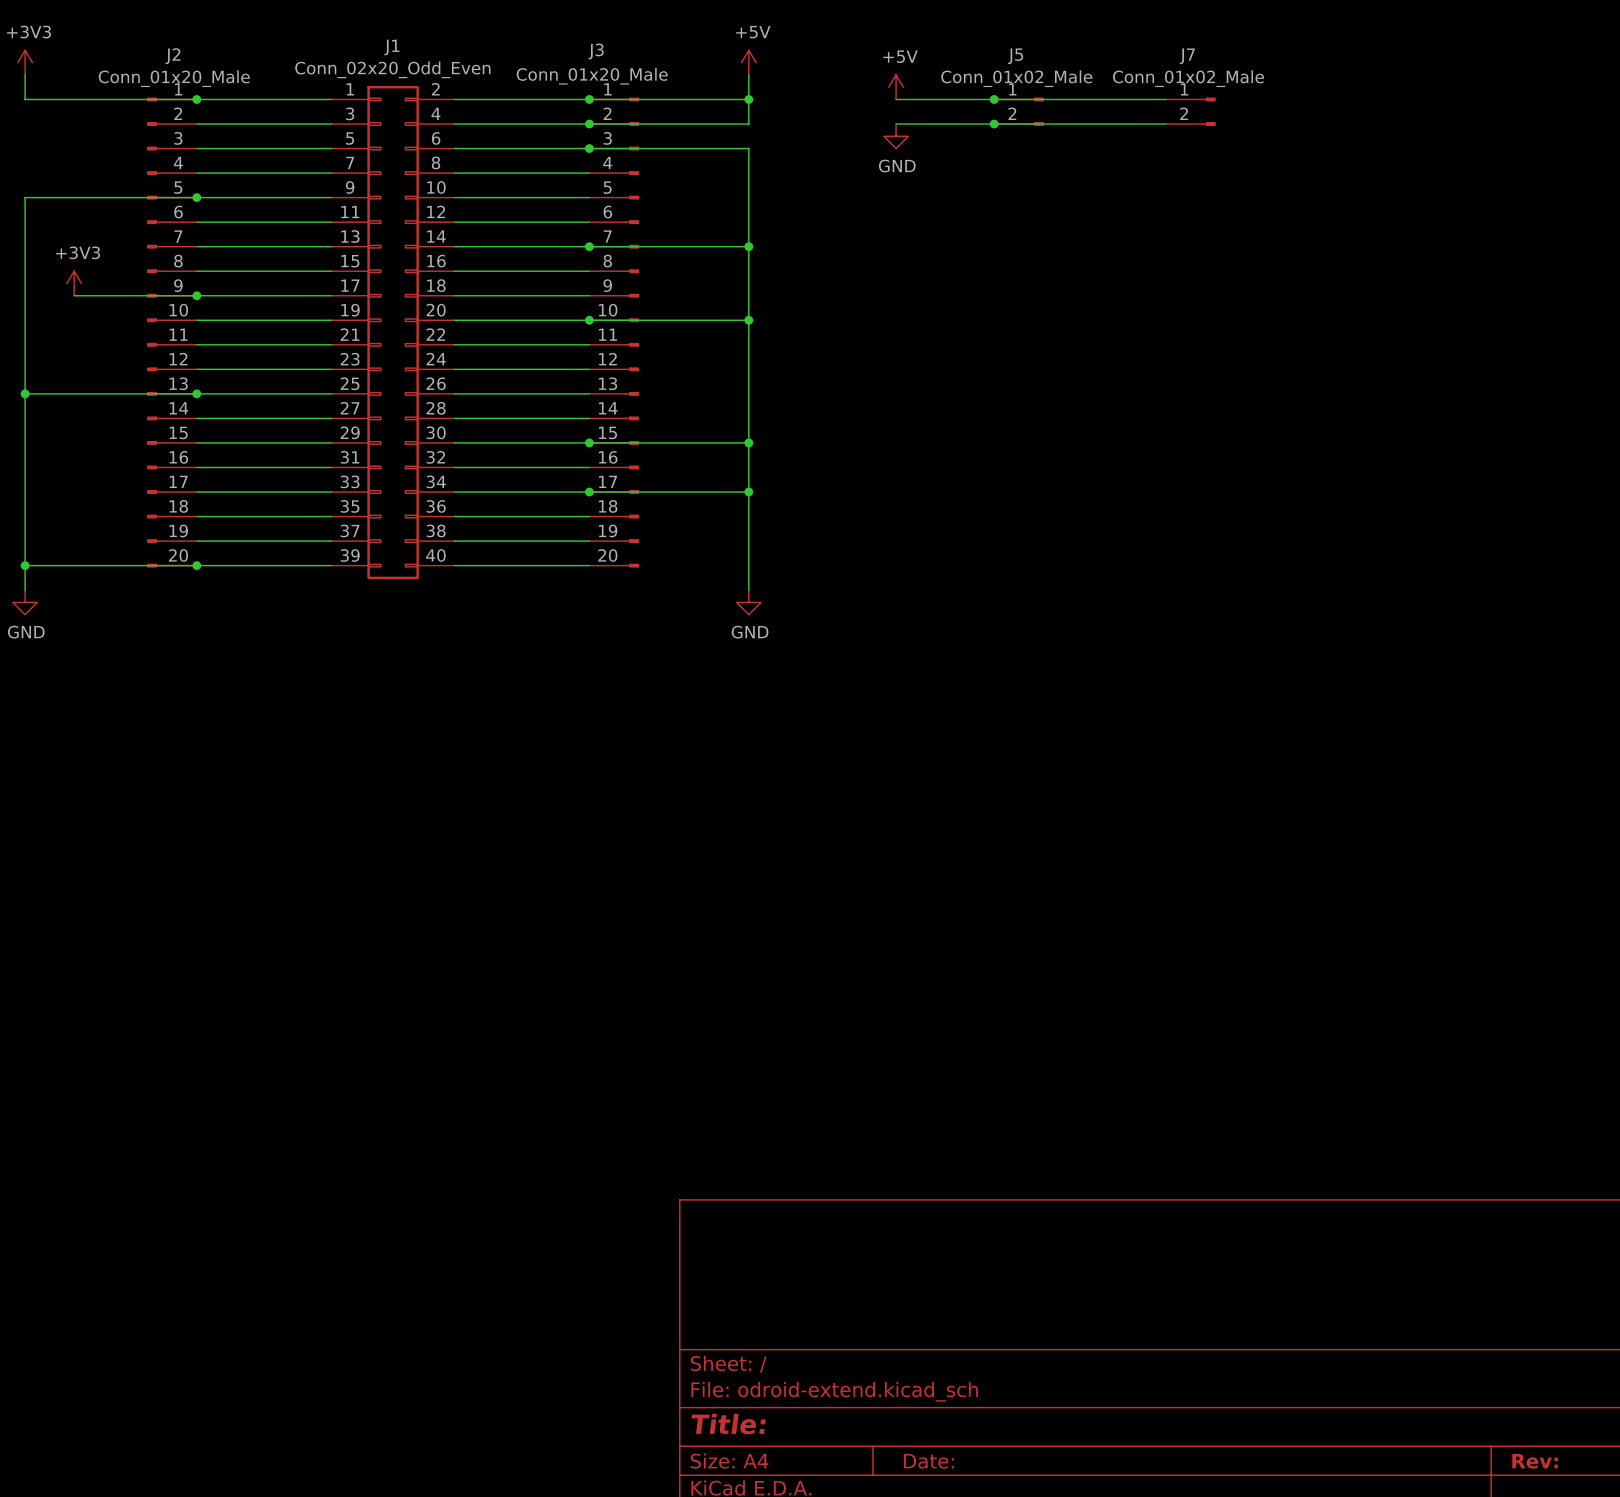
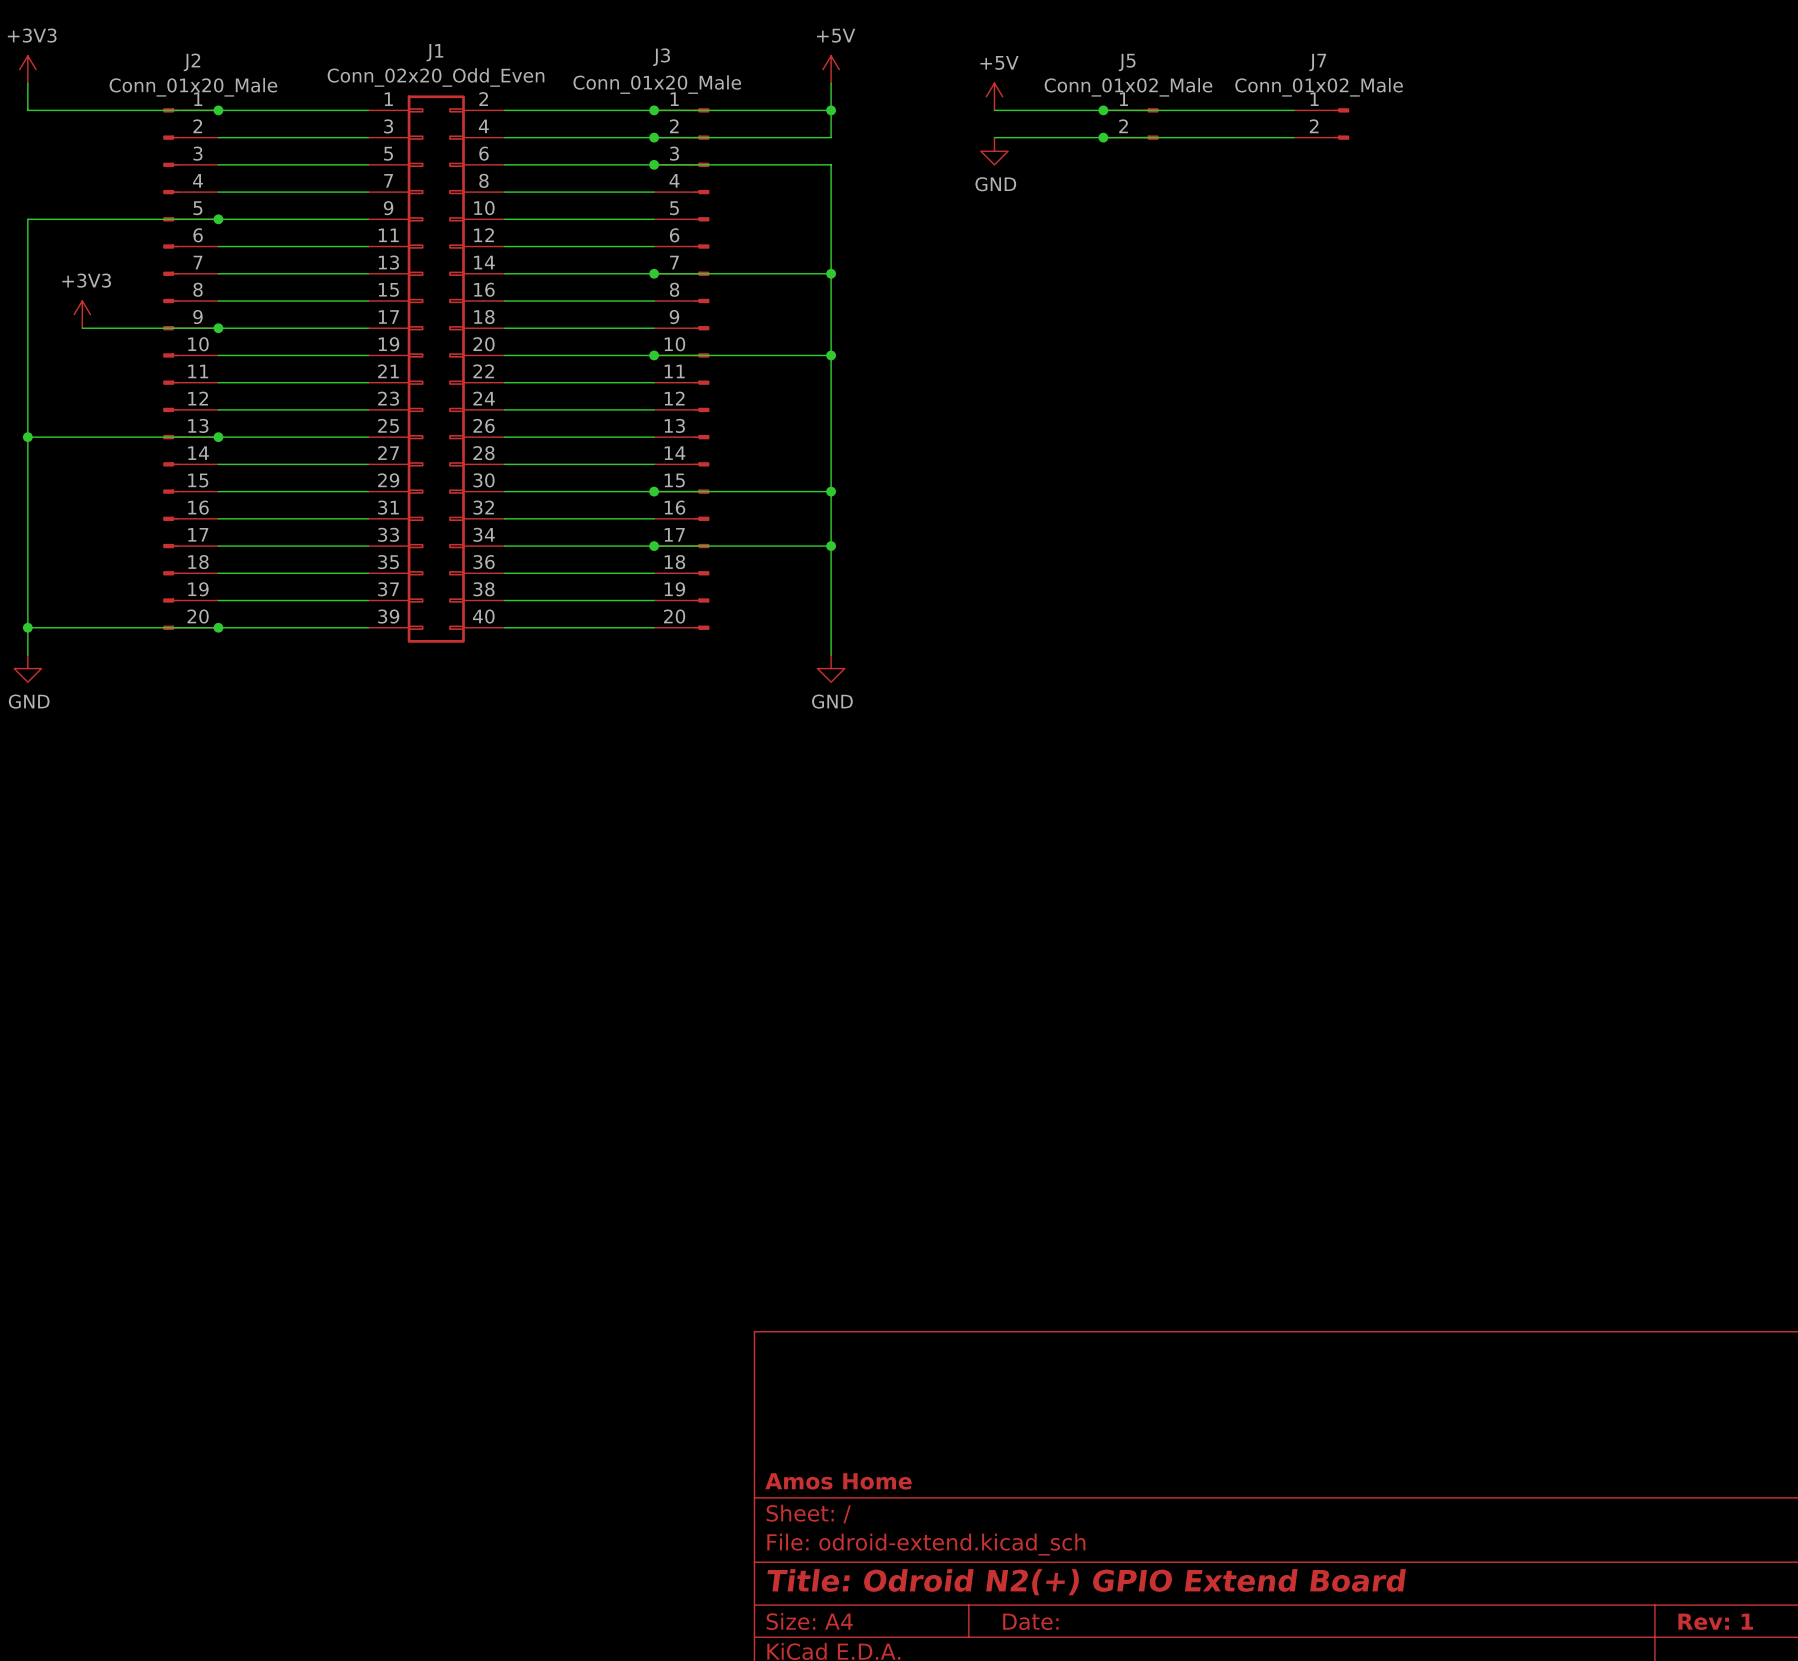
title block: none -> Amos Home (838, 1481)
title block: Title: (728, 1424) -> Title: Odroid N2(+) GPIO Extend Board (1086, 1582)
title block: Rev: (1535, 1461) -> Rev: 1 (1715, 1621)

